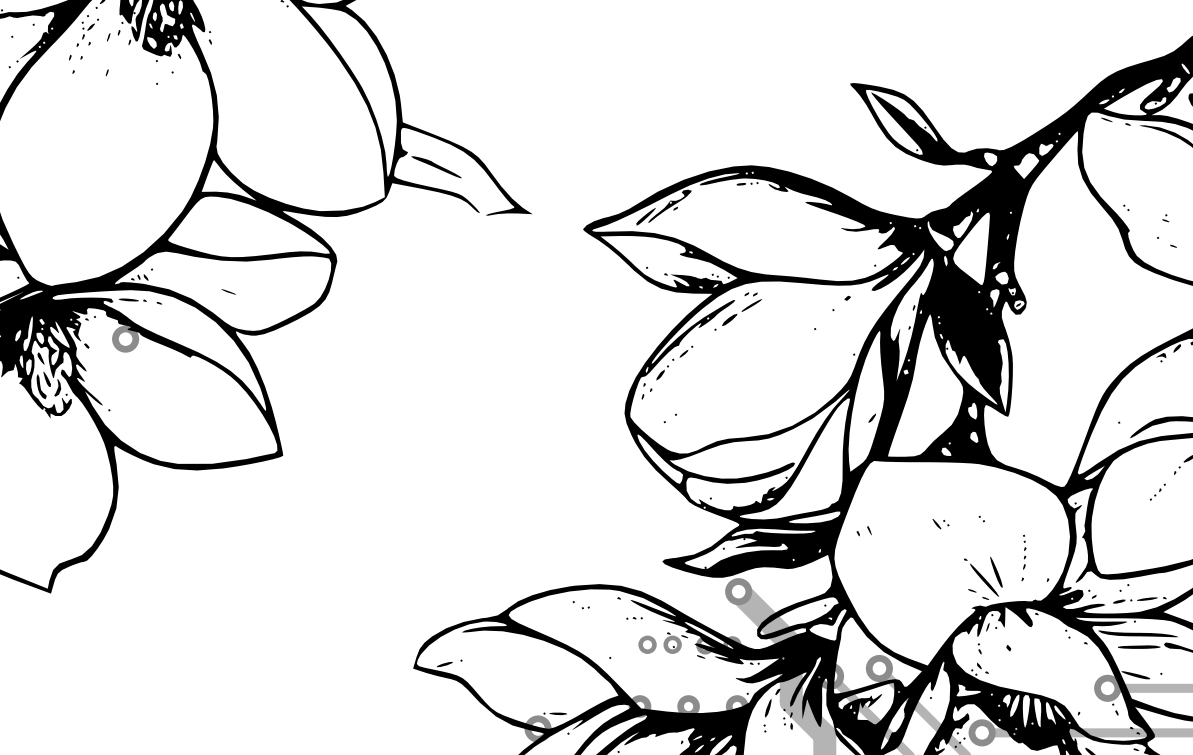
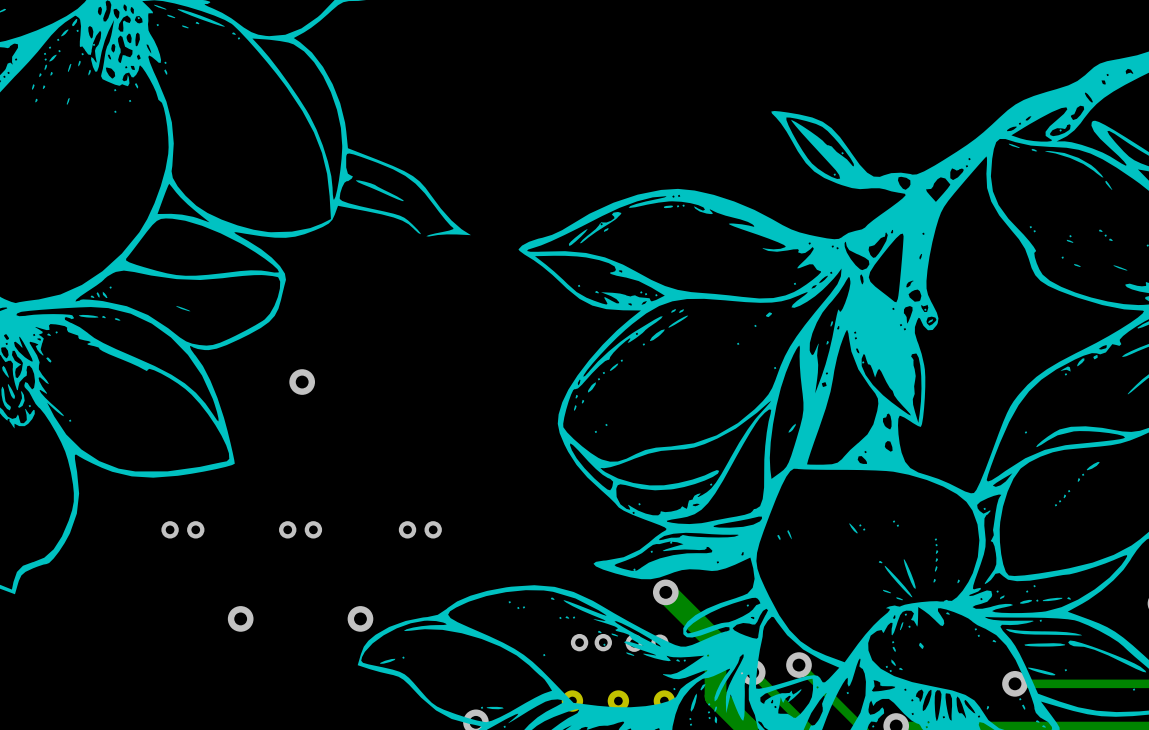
via: (125, 339) -> none
via: none -> (302, 382)
via: none -> (170, 529)
via: none -> (195, 529)
via: none -> (287, 529)
via: none -> (313, 529)
via: none -> (407, 529)
via: none -> (433, 529)
via: none -> (240, 618)
via: none -> (360, 618)

